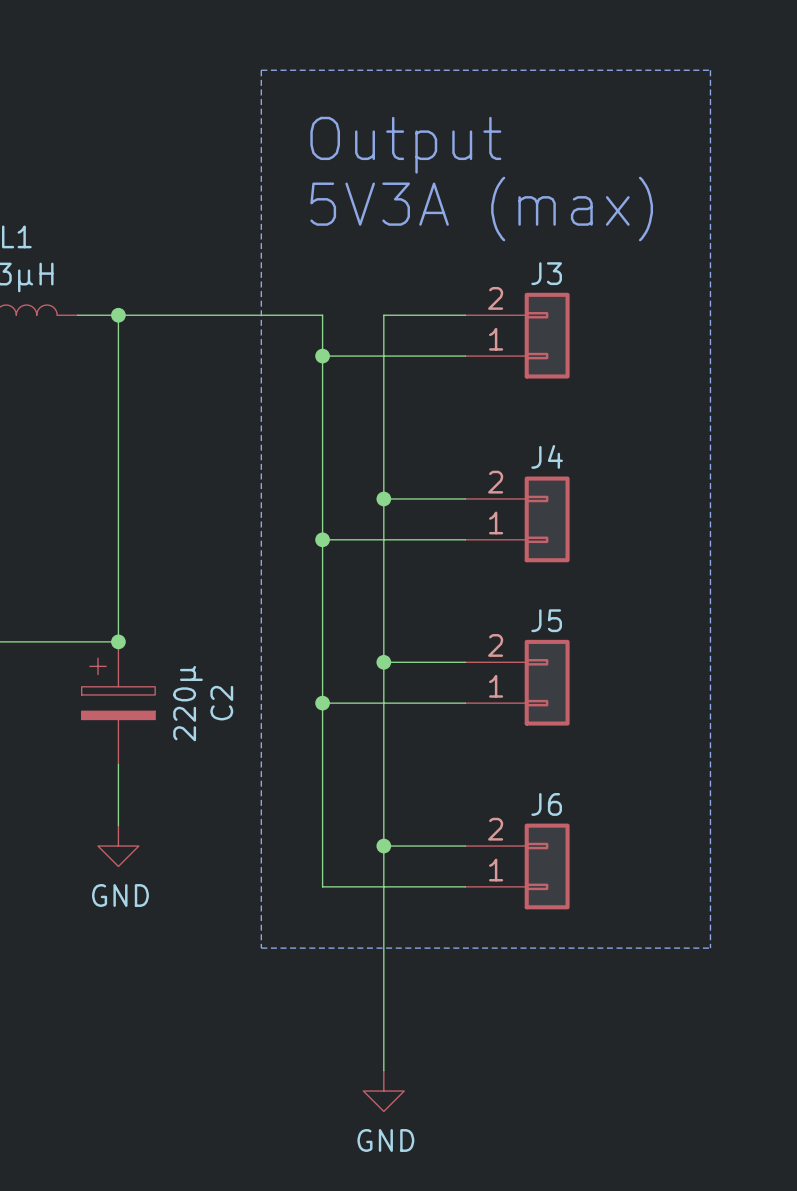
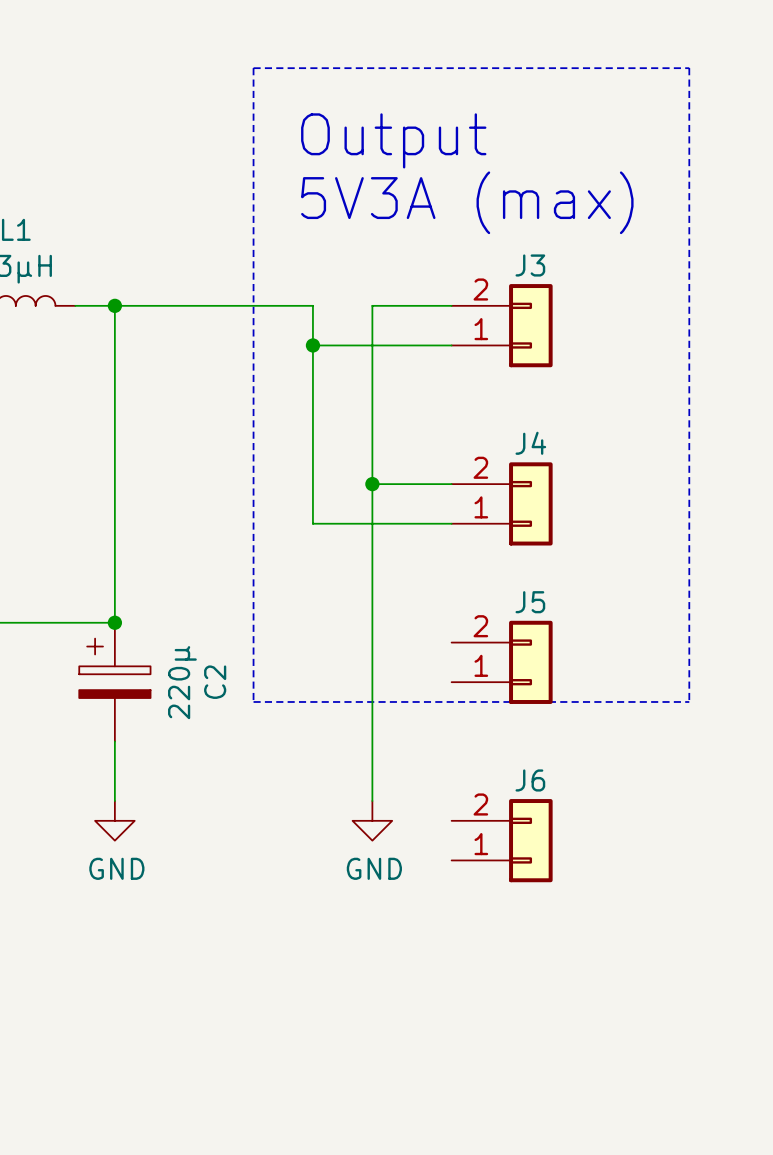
wire: (322, 539) (322, 886) (465, 886) -> none
junction: (322, 539) -> none
wire: (383, 662) (465, 662) -> none
junction: (383, 662) -> none
wire: (322, 703) (465, 703) -> none
junction: (322, 703) -> none
line: (261, 723) (261, 948) (710, 948) (710, 723) -> (253, 701) (689, 701)
wire: (383, 825) (383, 1070) -> none
wire: (383, 846) (465, 846) -> none
junction: (383, 846) -> none
power symbol position: GND (383, 1091) -> GND (372, 820)

